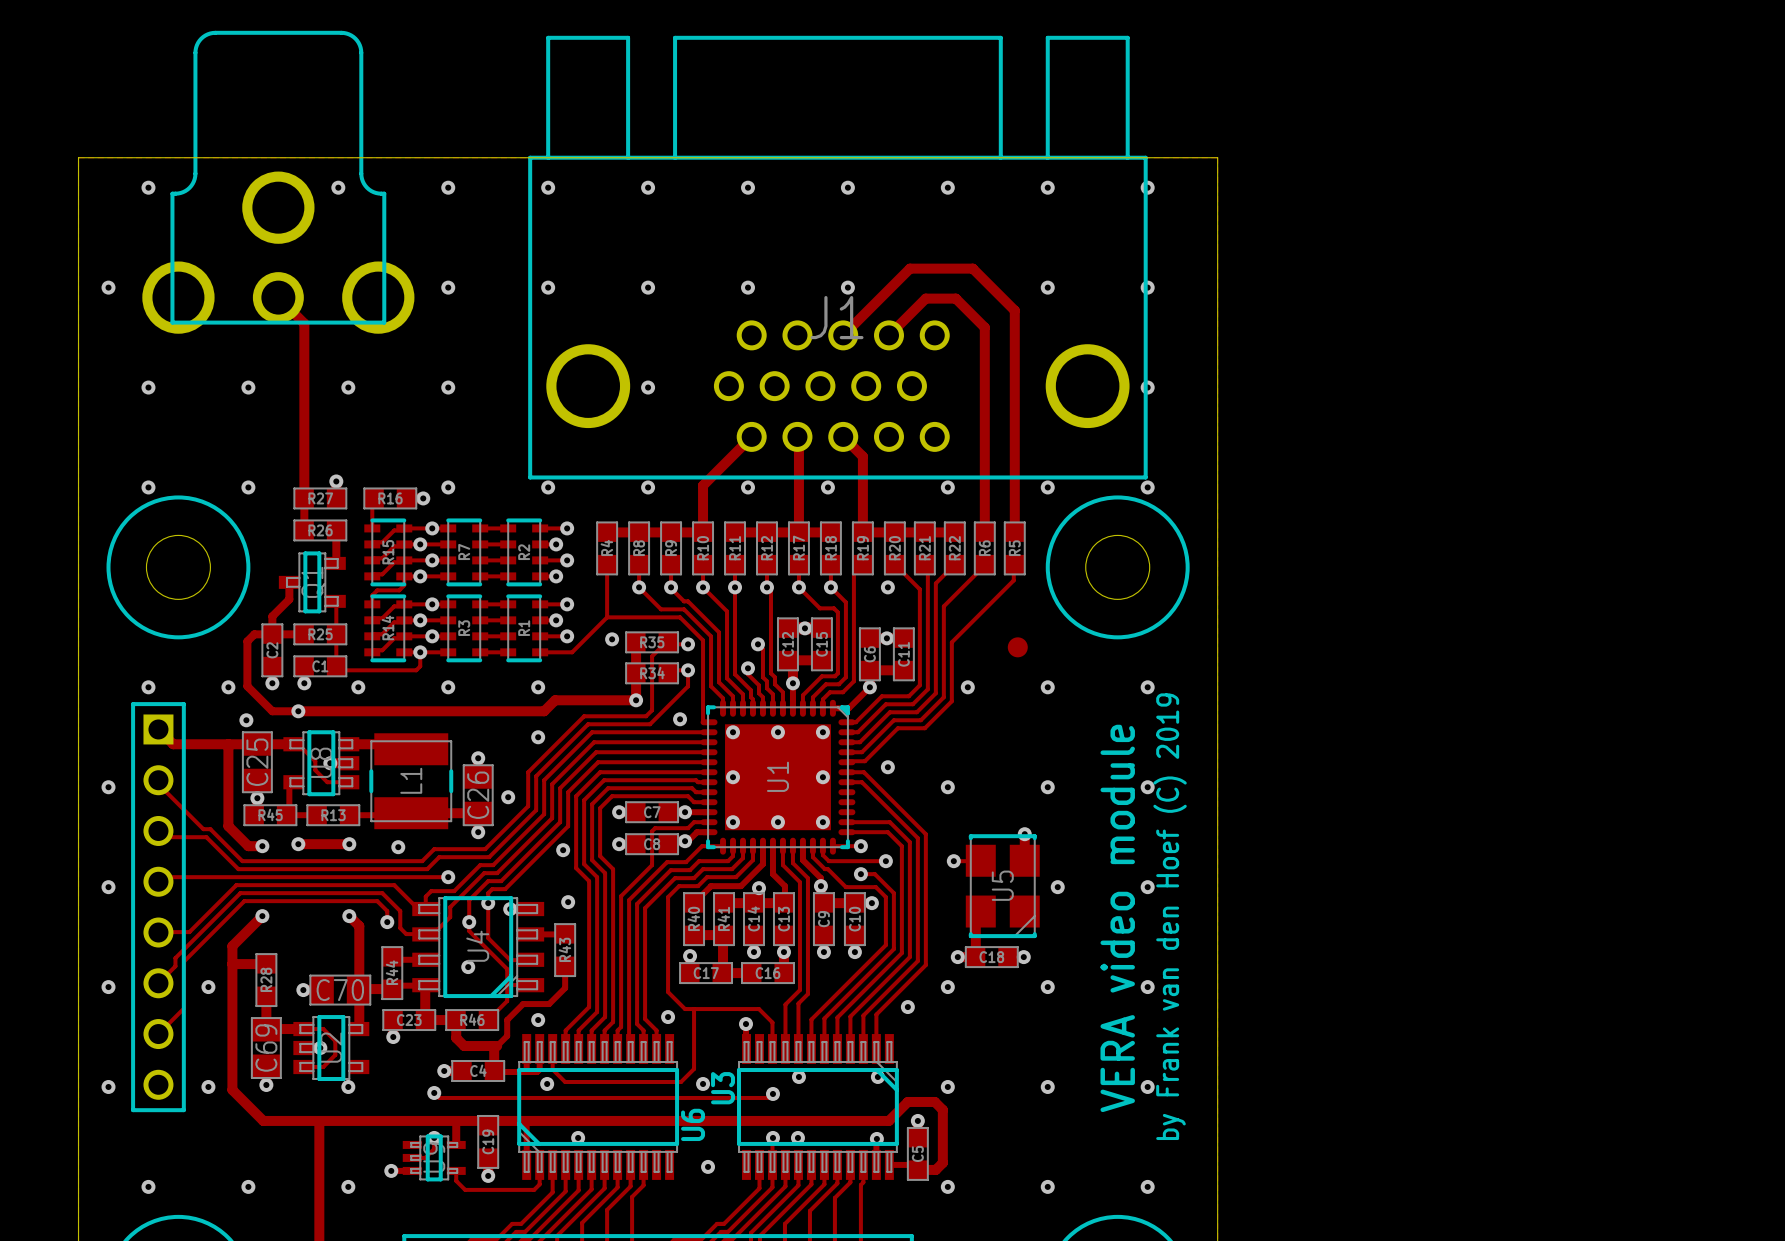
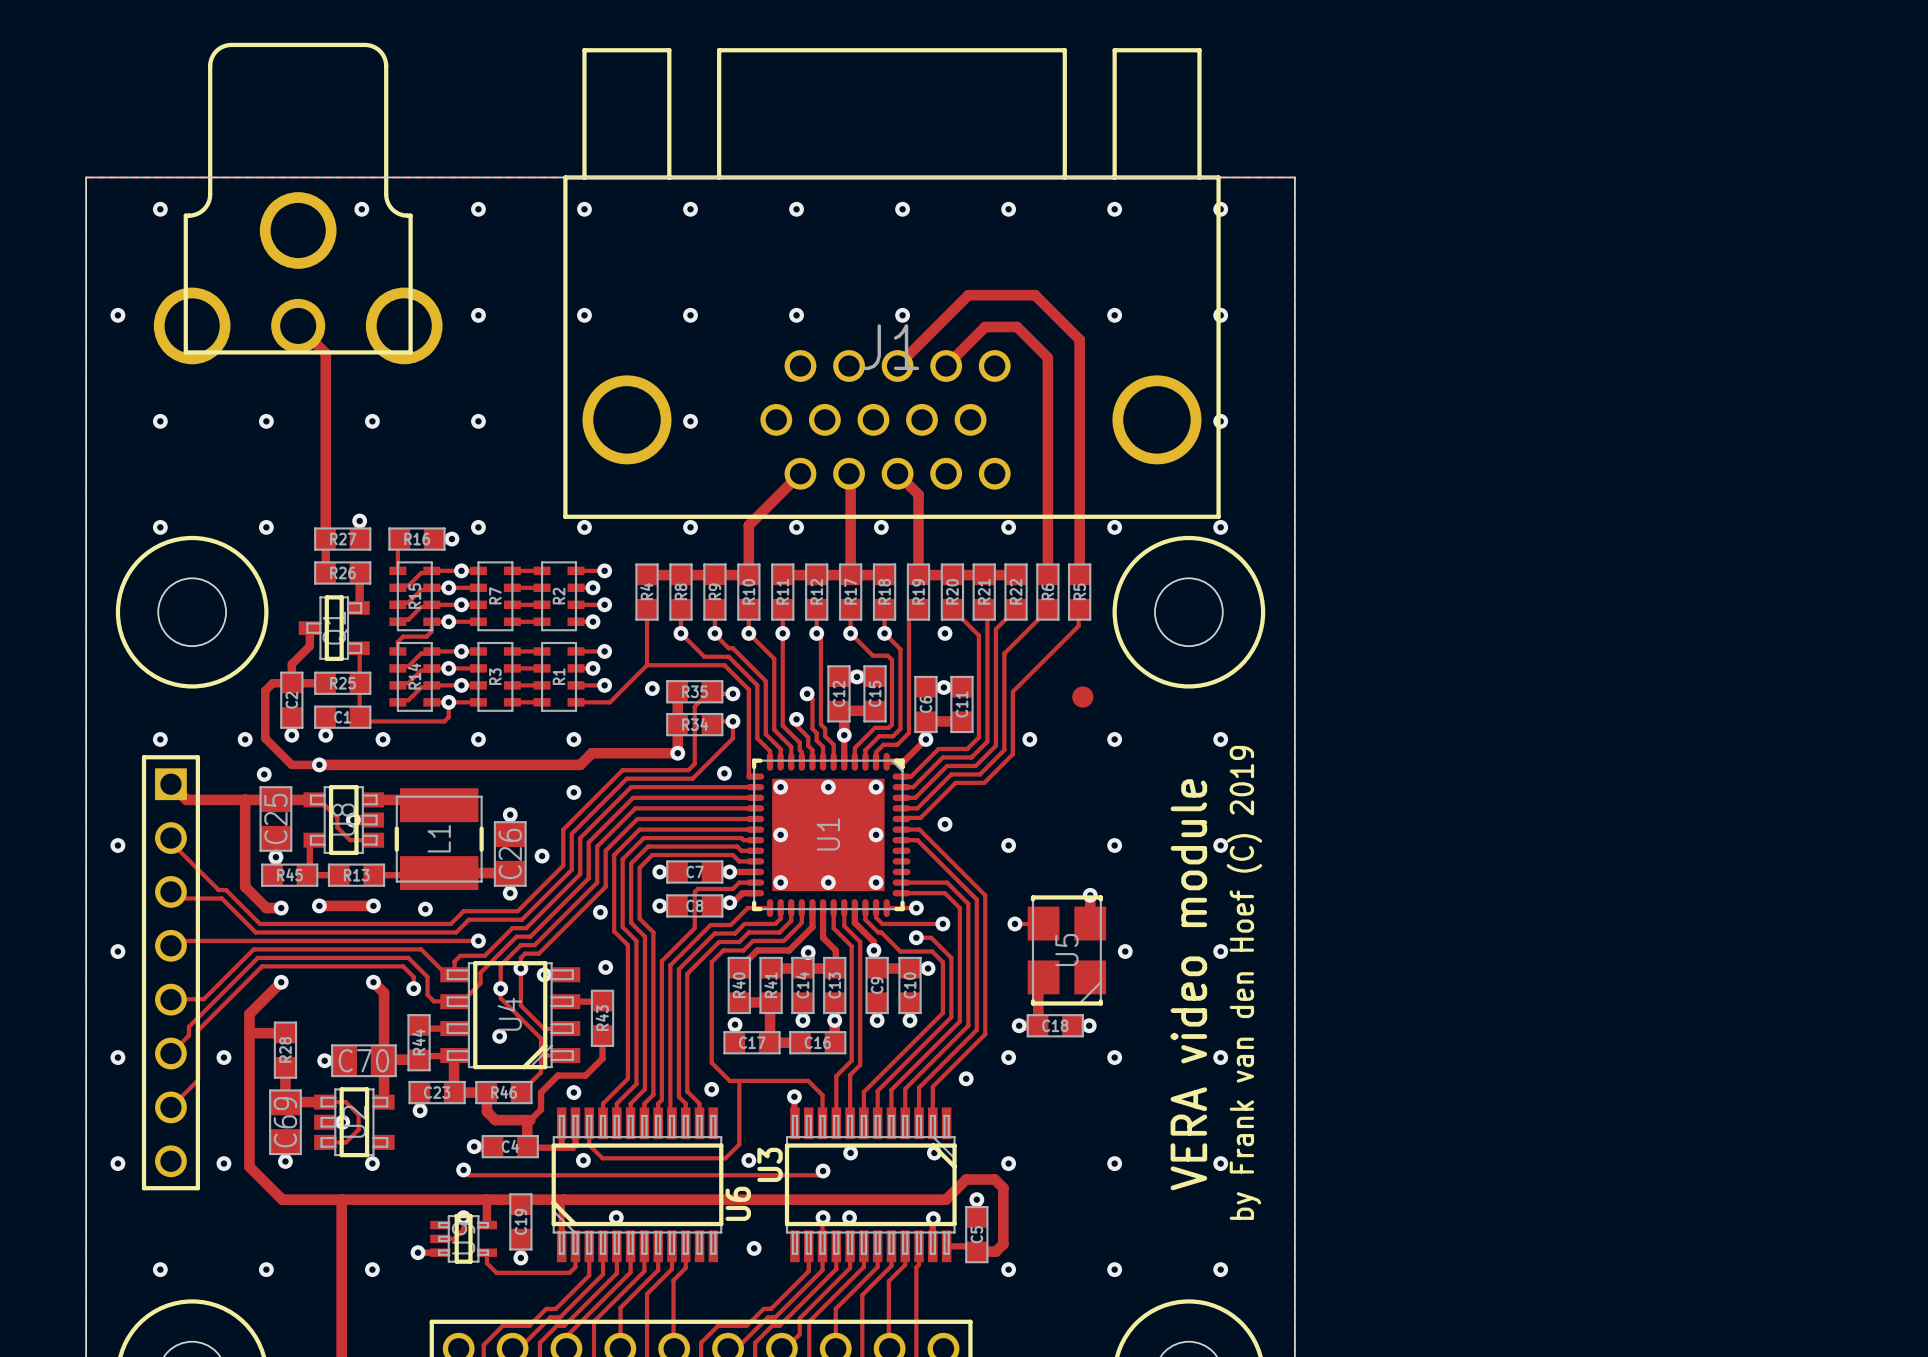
R15 footprint: [364, 518, 413, 587] -> [389, 561, 441, 632]
R7 footprint: [440, 518, 489, 587] -> [469, 561, 521, 632]
R2 footprint: [500, 518, 549, 587] -> [533, 561, 585, 632]
R14 footprint: [364, 594, 413, 663] -> [389, 641, 441, 712]
R3 footprint: [440, 594, 489, 663] -> [469, 641, 521, 712]
R1 footprint: [500, 594, 549, 663] -> [533, 641, 585, 712]

